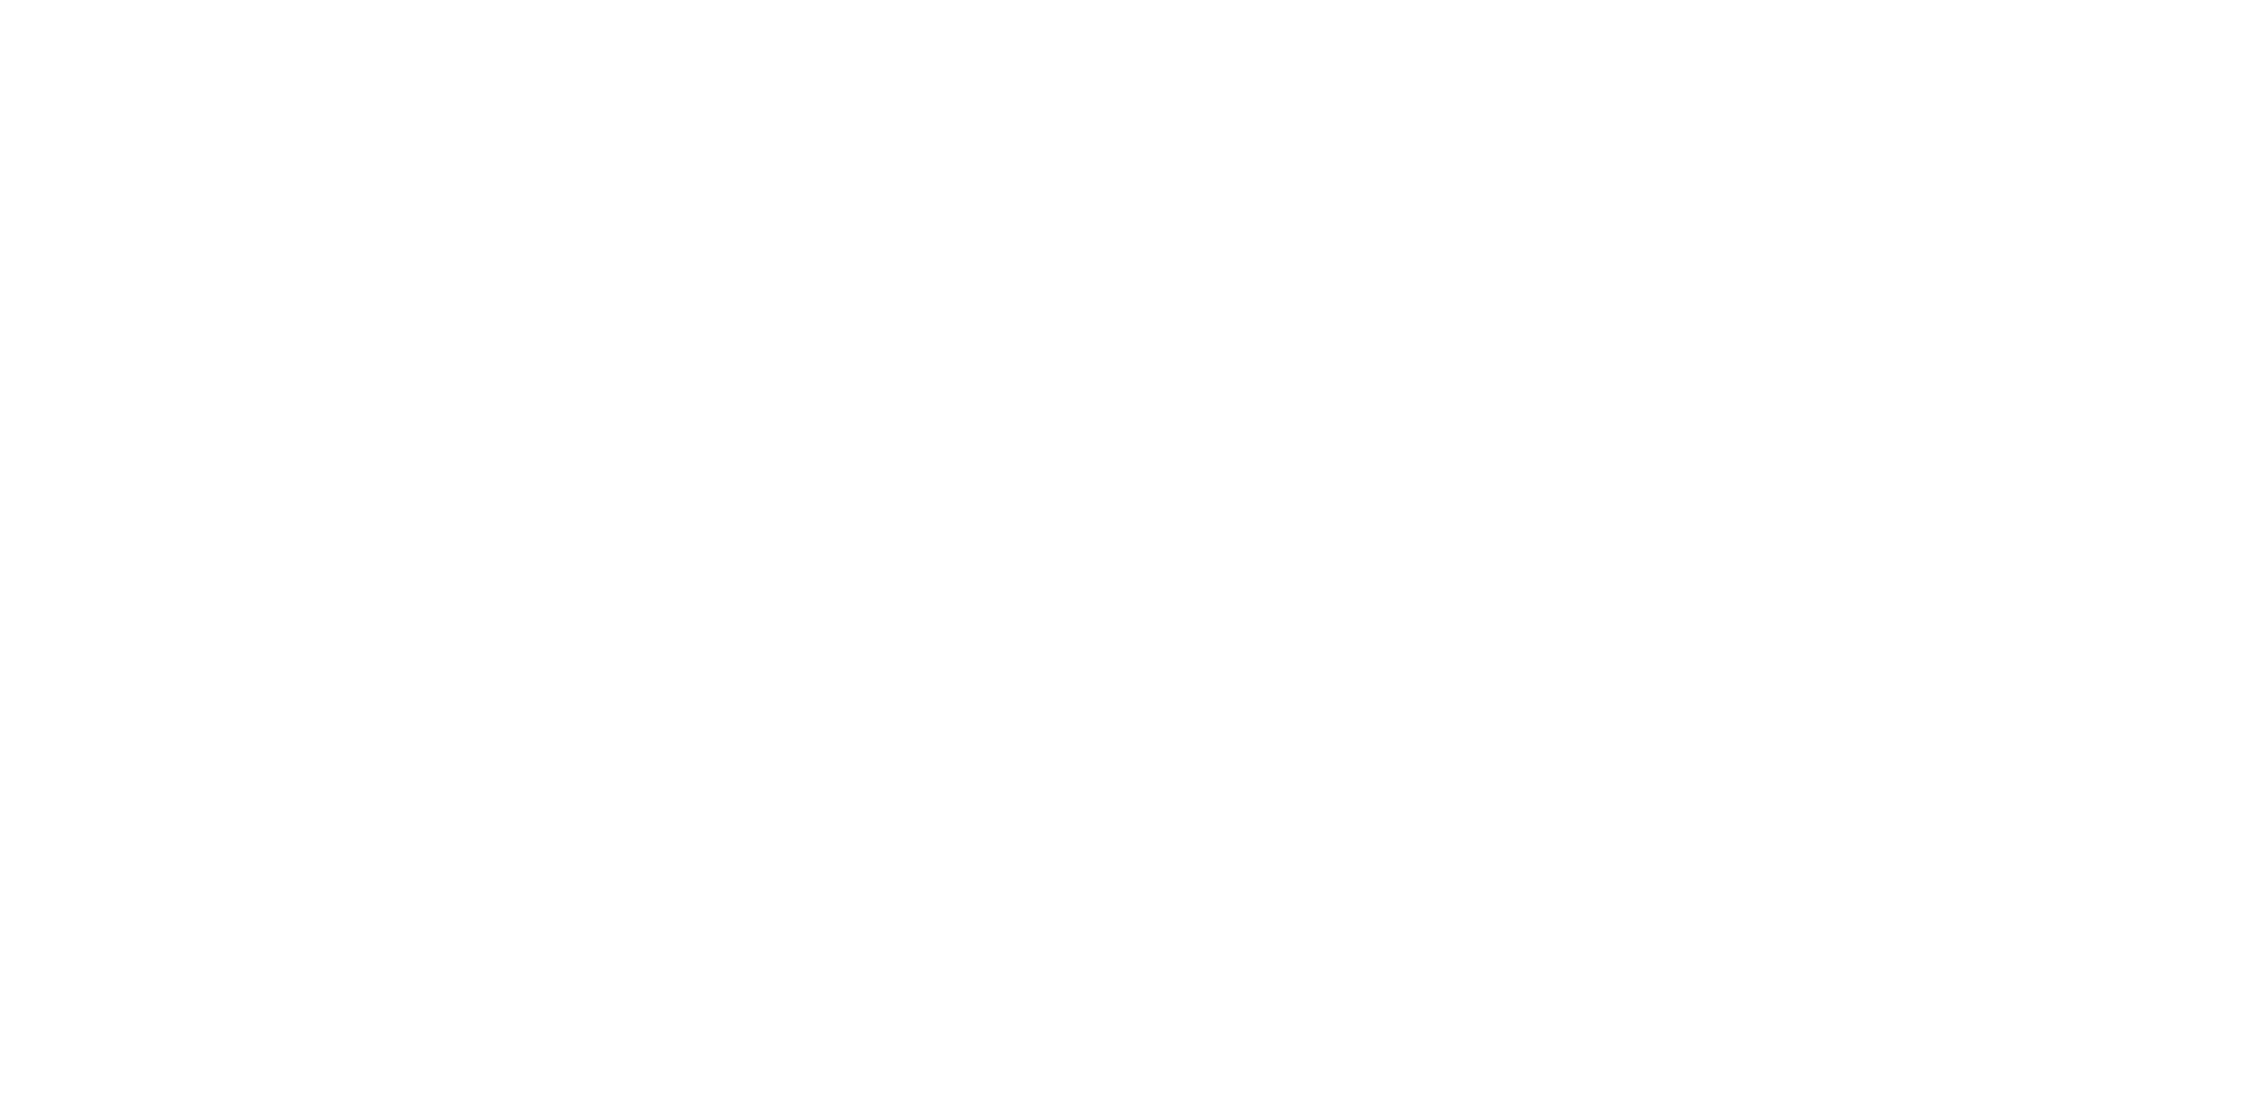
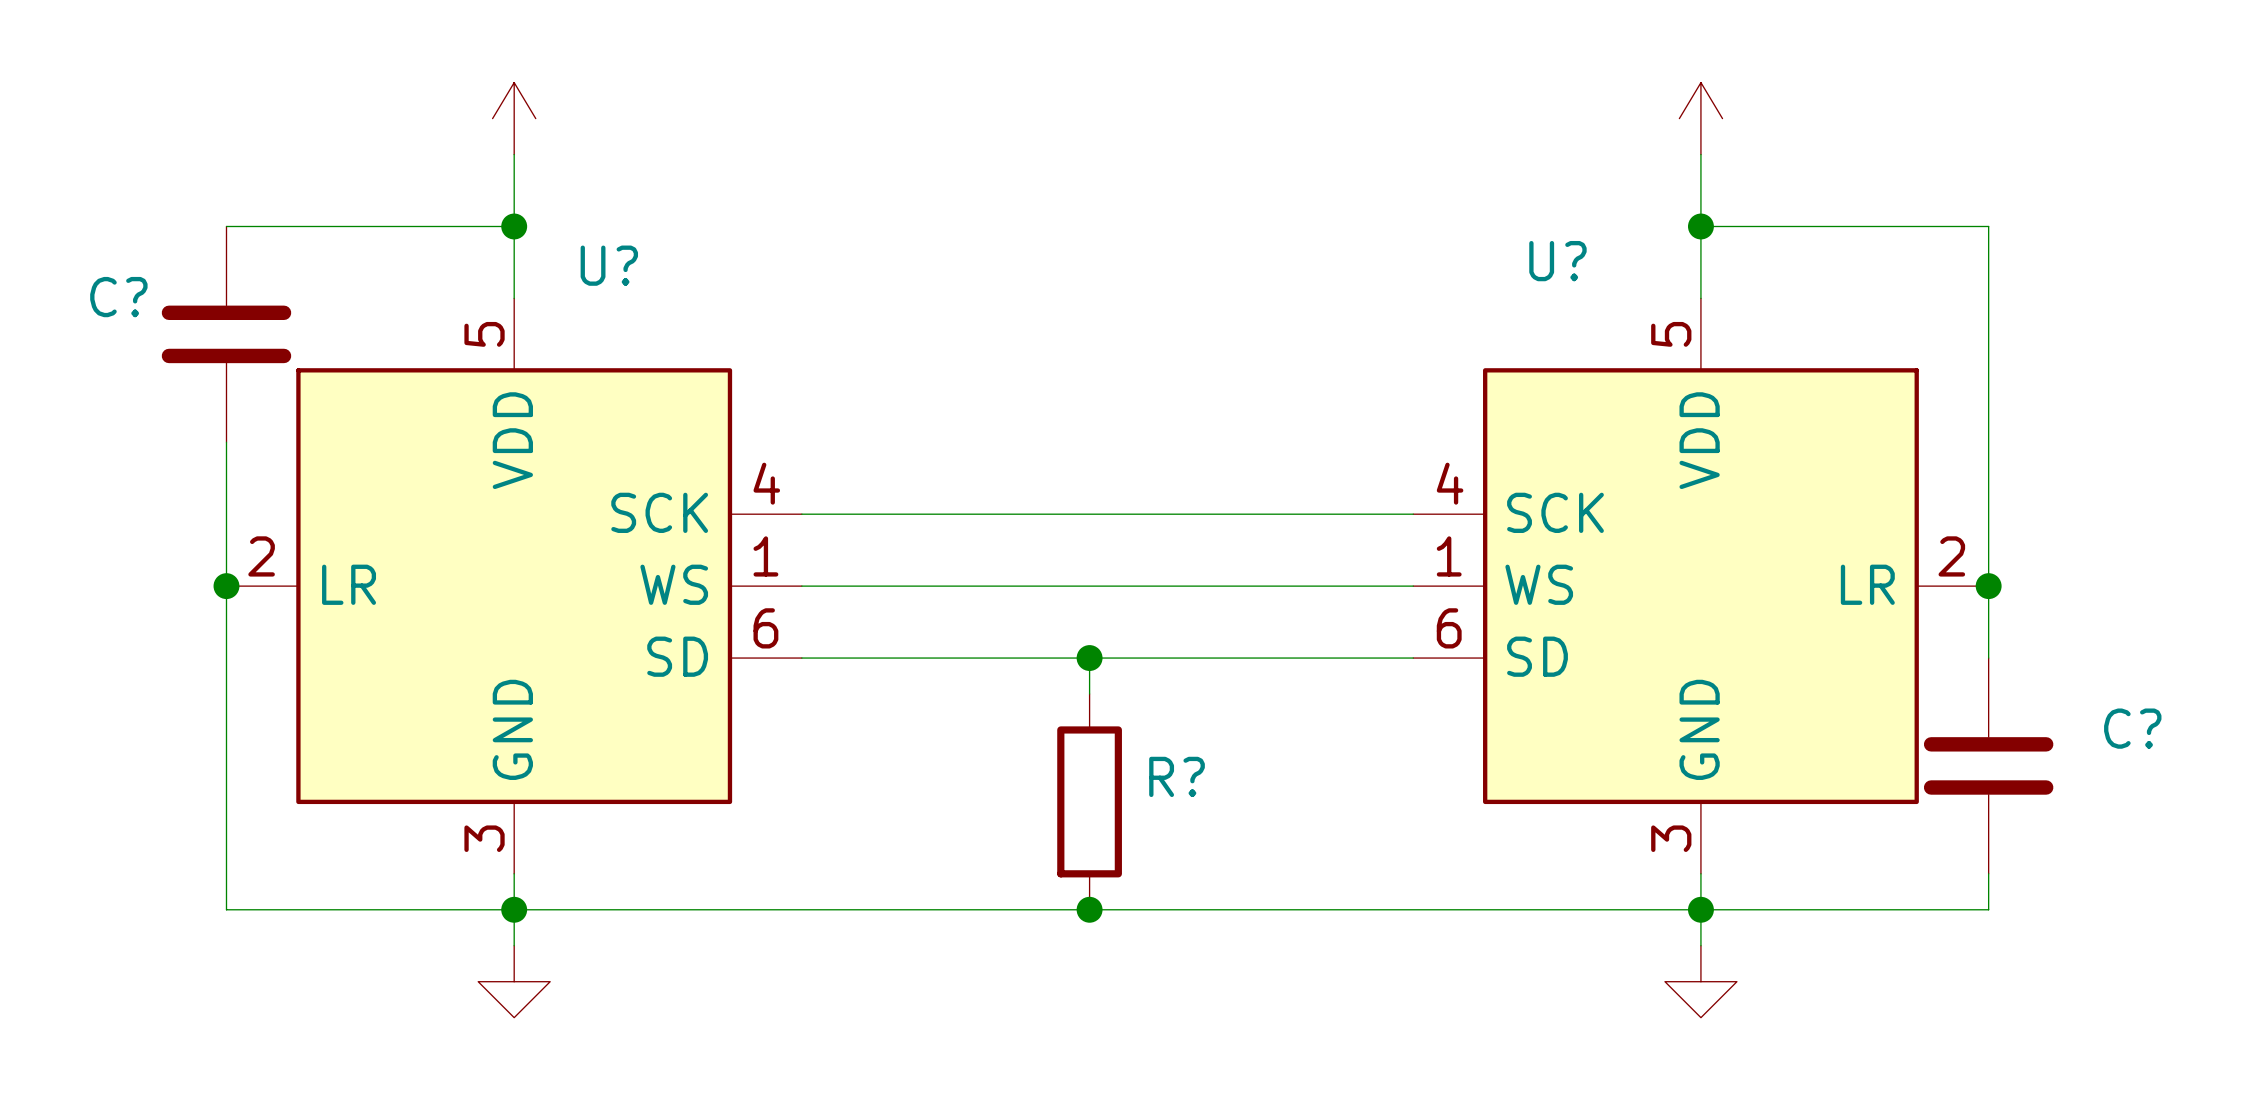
power symbol: none -> (514, 118)
power symbol: none -> (1700, 118)
wire: none -> (514, 154) (514, 298)
wire: none -> (1700, 154) (1700, 298)
wire: none -> (226, 226) (514, 226)
junction: none -> (514, 226)
wire: none -> (1700, 226) (1988, 226) (1988, 658)
junction: none -> (1700, 226)
C?: none -> (226, 334)
wire: none -> (226, 442) (226, 909) (1988, 909) (1988, 873)
wire: none -> (801, 514) (1413, 514)
junction: none -> (226, 586)
U?: none -> (514, 586)
wire: none -> (801, 586) (1413, 586)
U?: none -> (1700, 586)
junction: none -> (1988, 586)
wire: none -> (801, 658) (1413, 658)
wire: none -> (1089, 658) (1089, 694)
junction: none -> (1089, 658)
C?: none -> (1988, 765)
R?: none -> (1089, 801)
wire: none -> (514, 873) (514, 945)
wire: none -> (1700, 873) (1700, 945)
junction: none -> (514, 909)
junction: none -> (1089, 909)
junction: none -> (1700, 909)
power symbol: none -> (514, 981)
power symbol: none -> (1700, 981)

